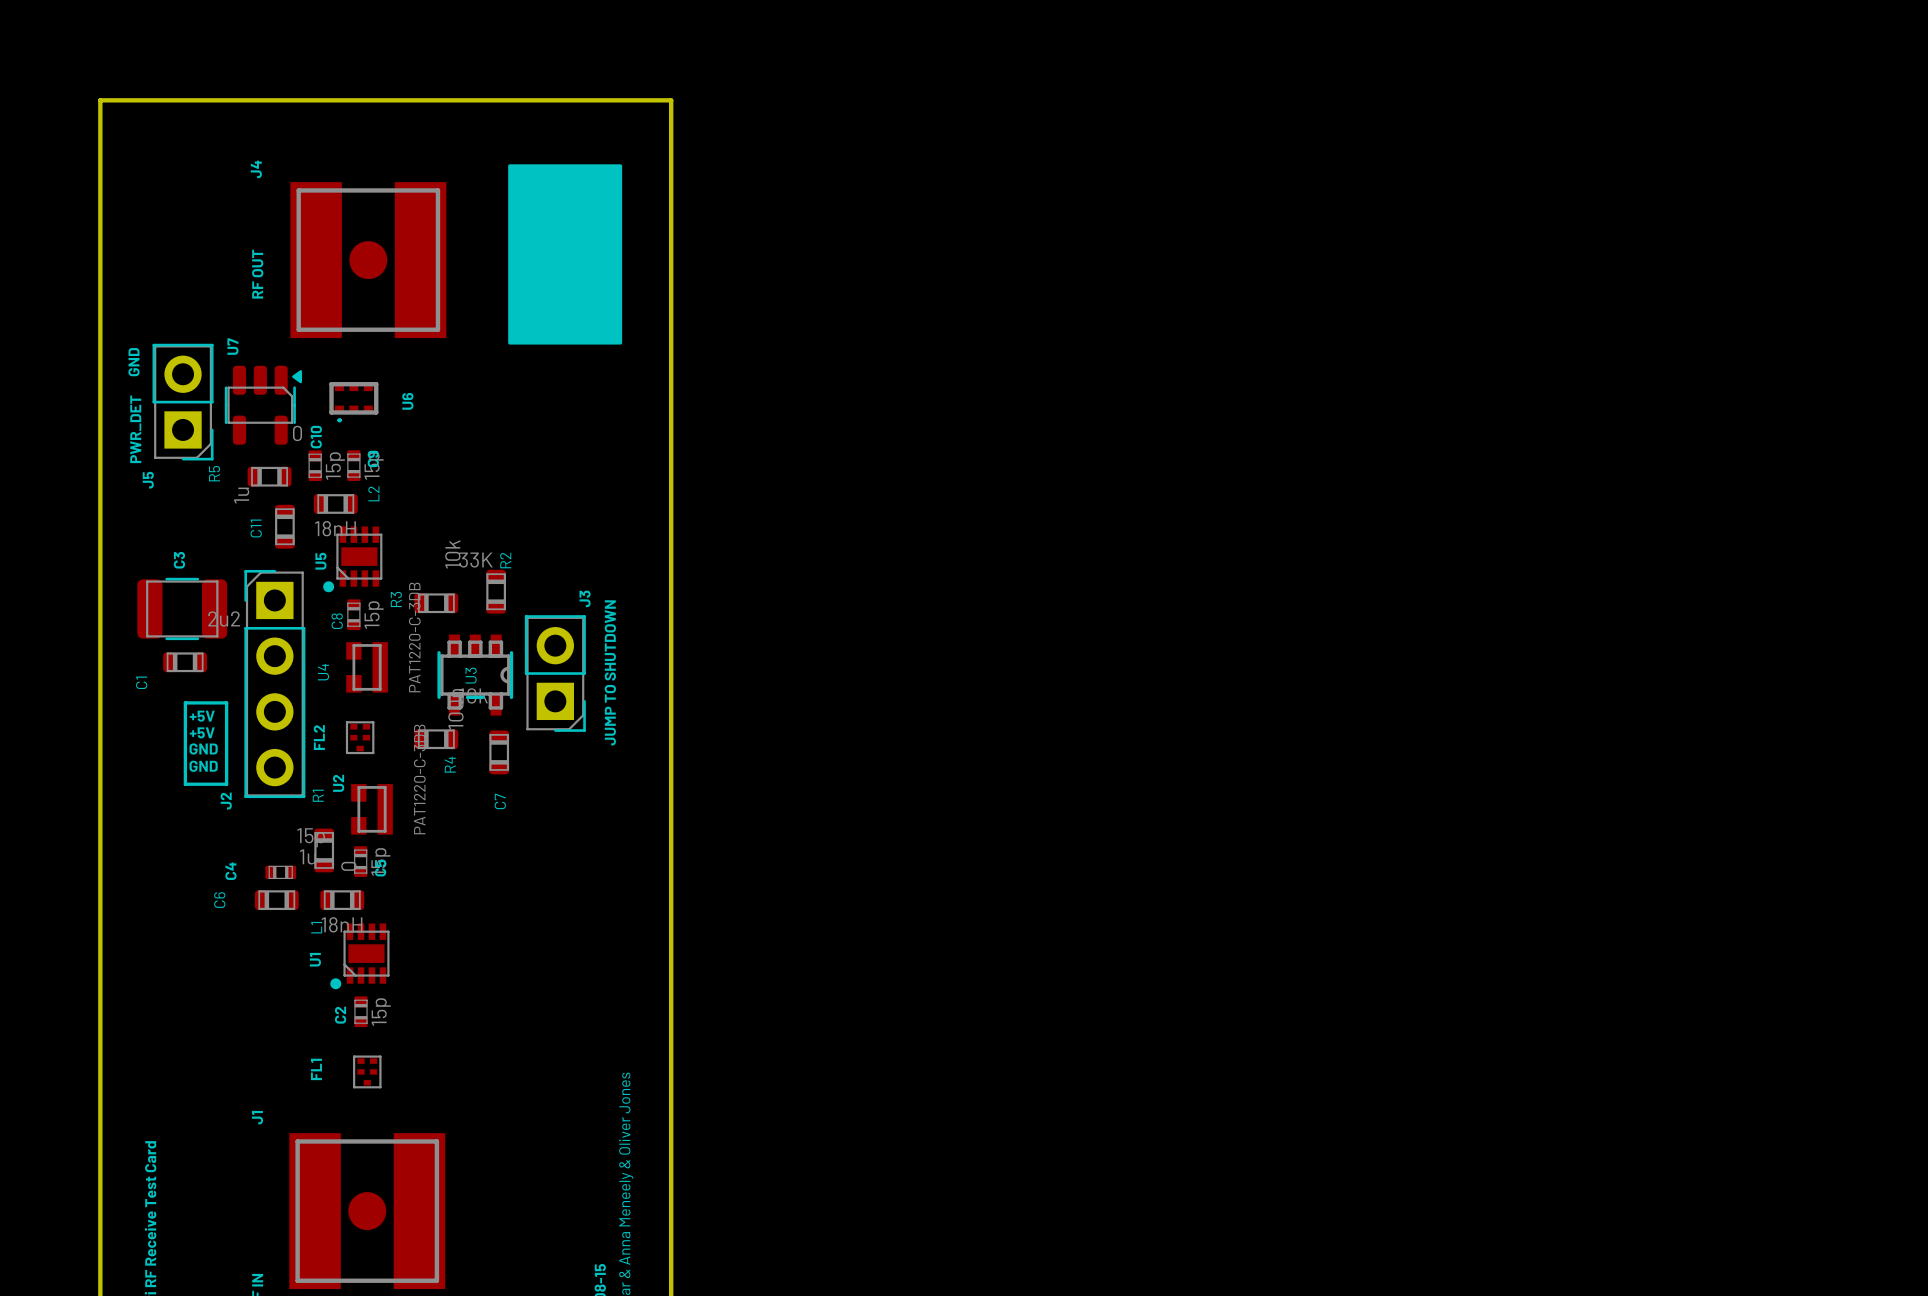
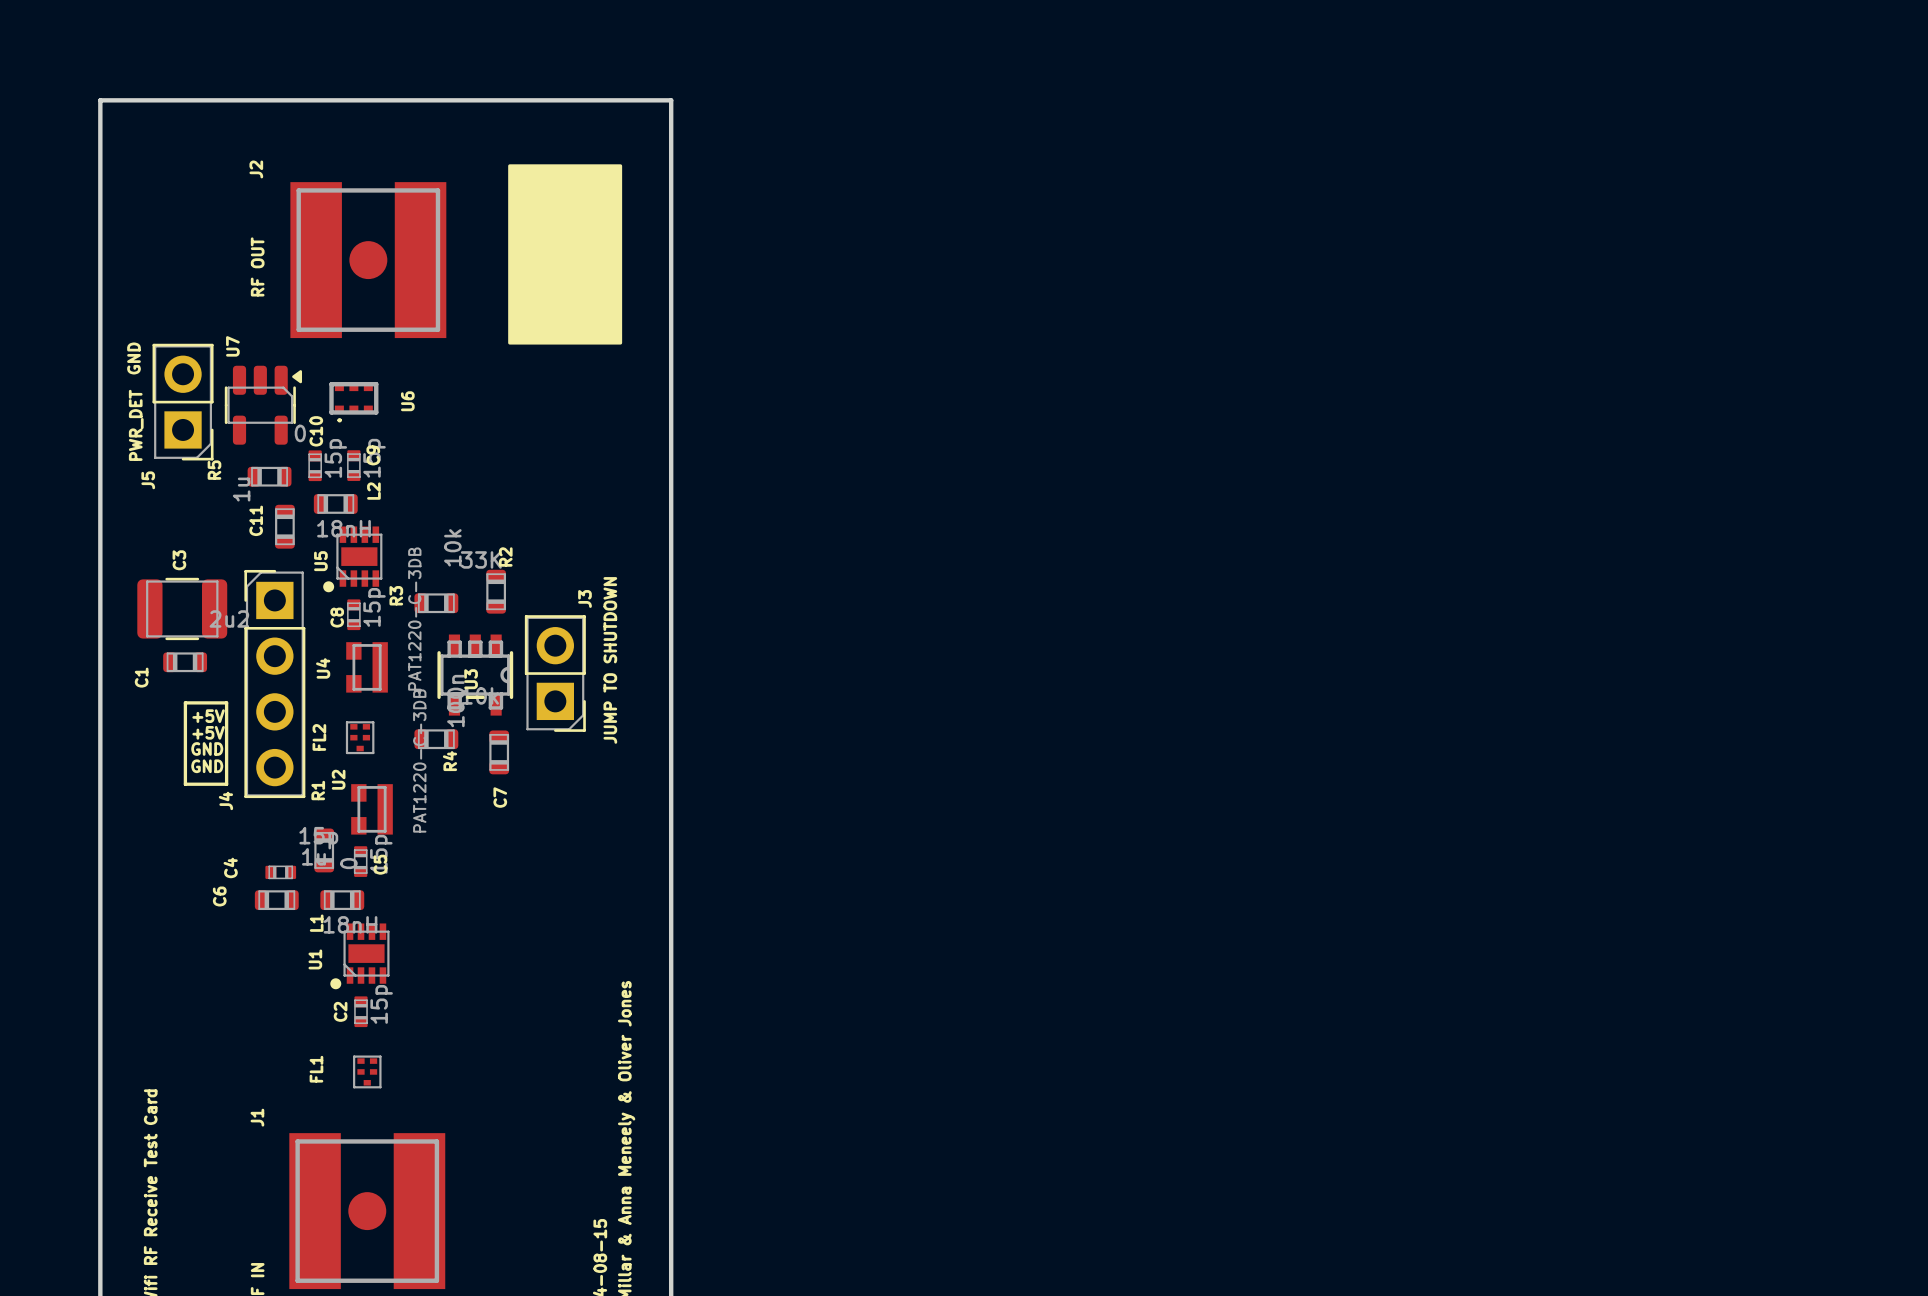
J4 name: J4 (256, 169) -> J2 (256, 169)
J2 name: J2 (226, 801) -> J4 (225, 800)

